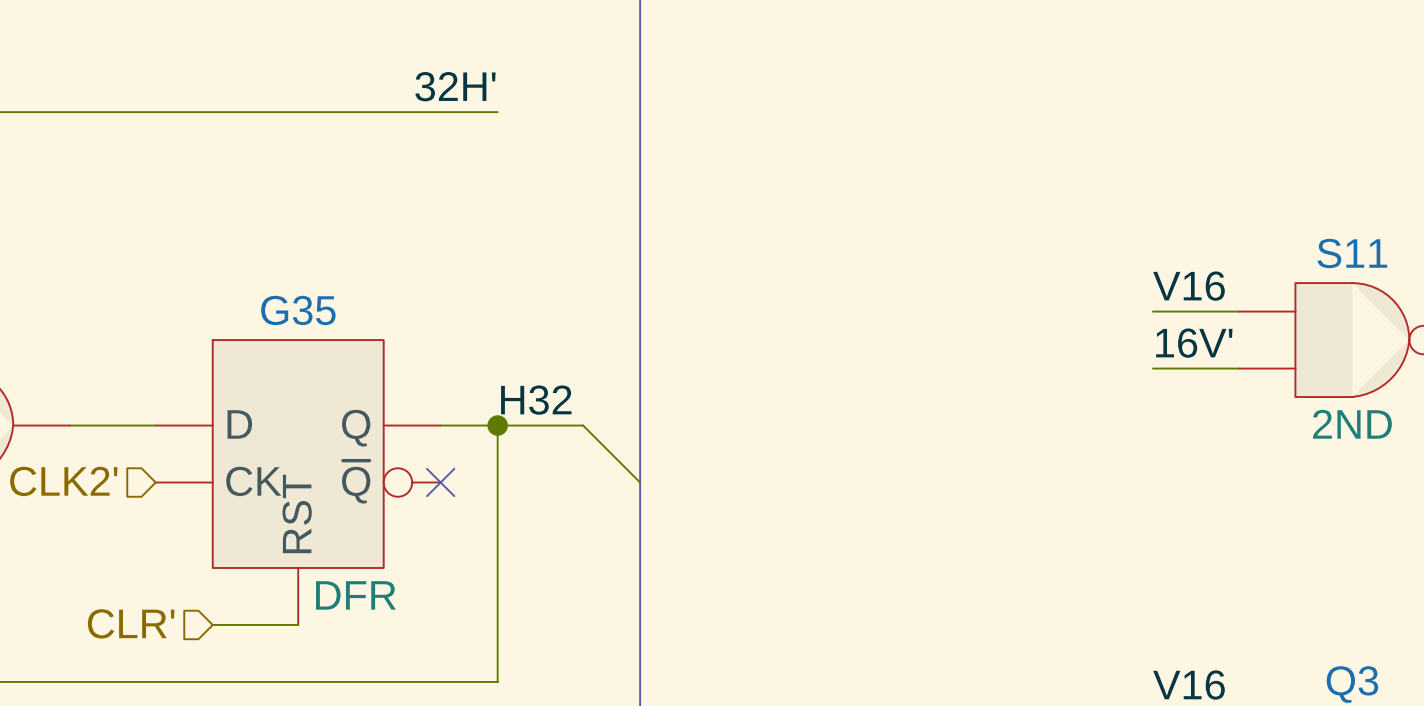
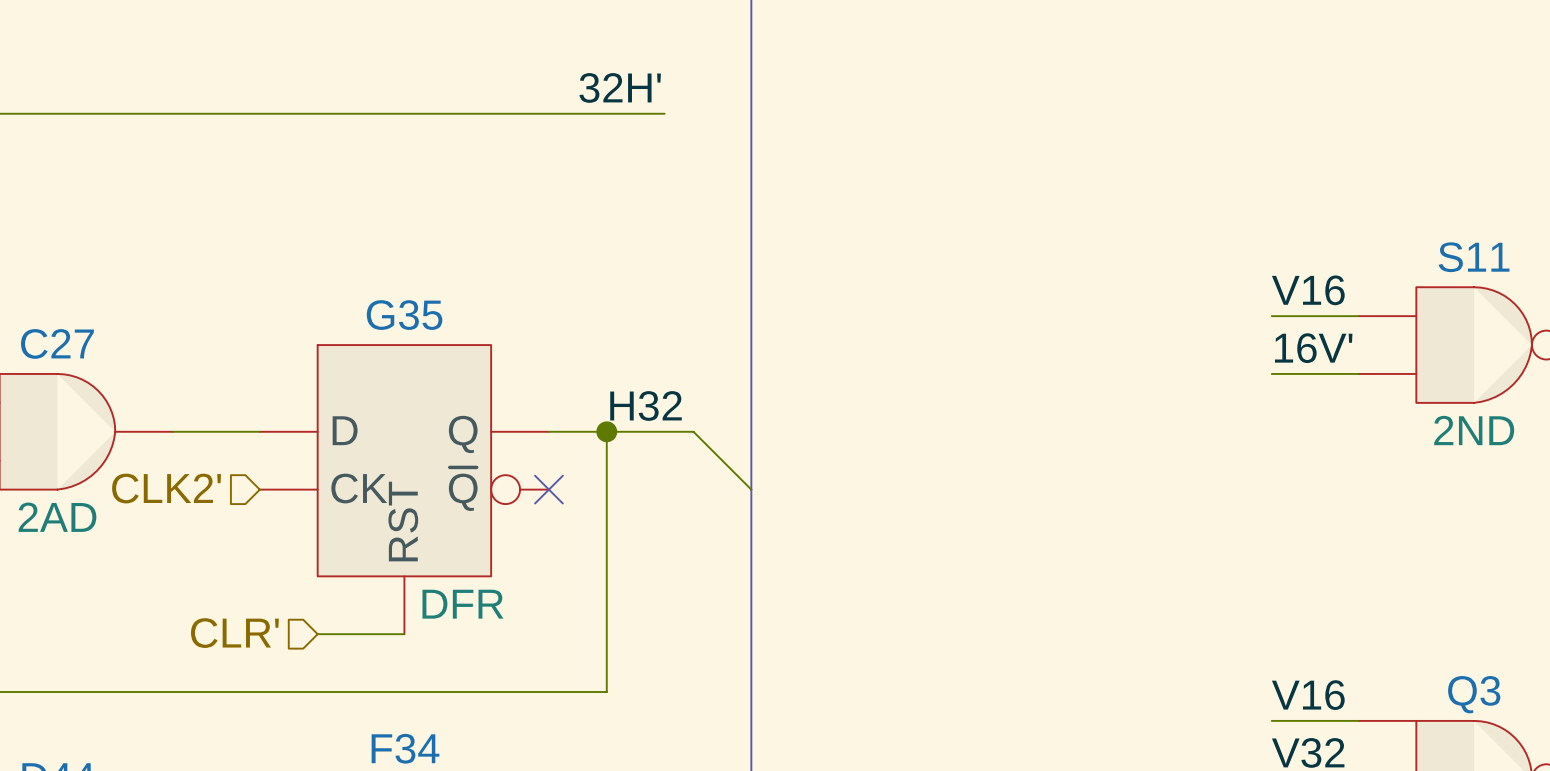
label position: 32H' (455, 86) -> 32H' (620, 87)
wire: none -> (606, 113) (664, 113)

